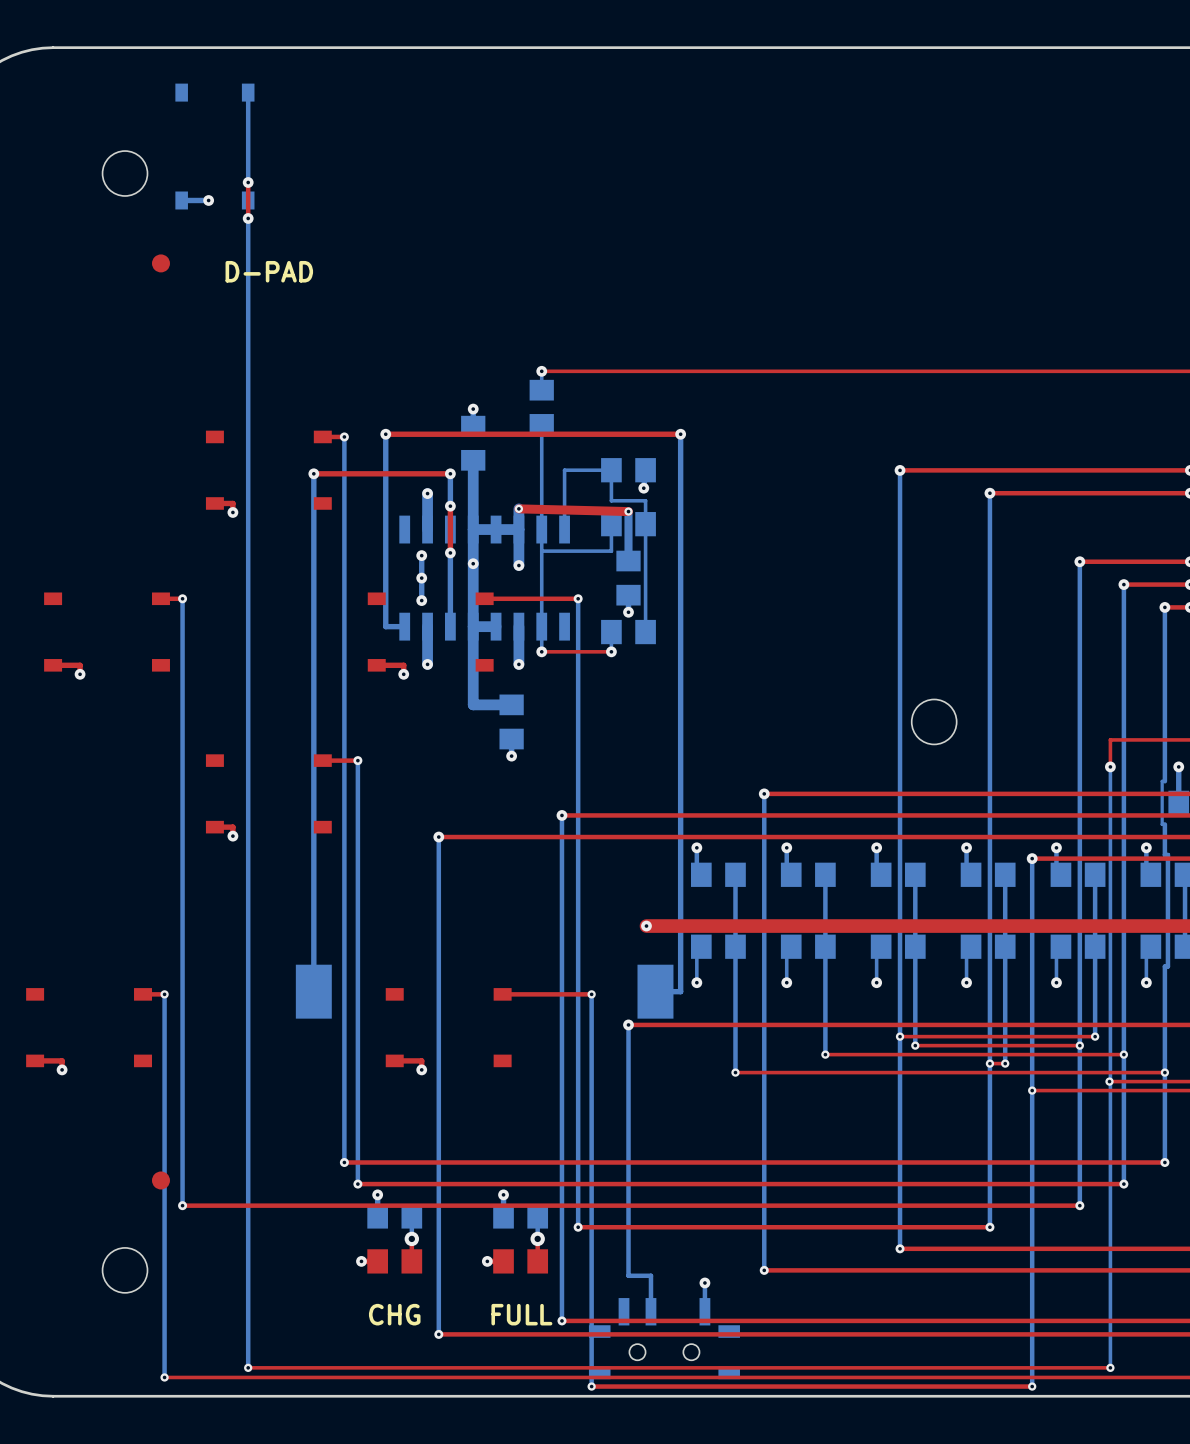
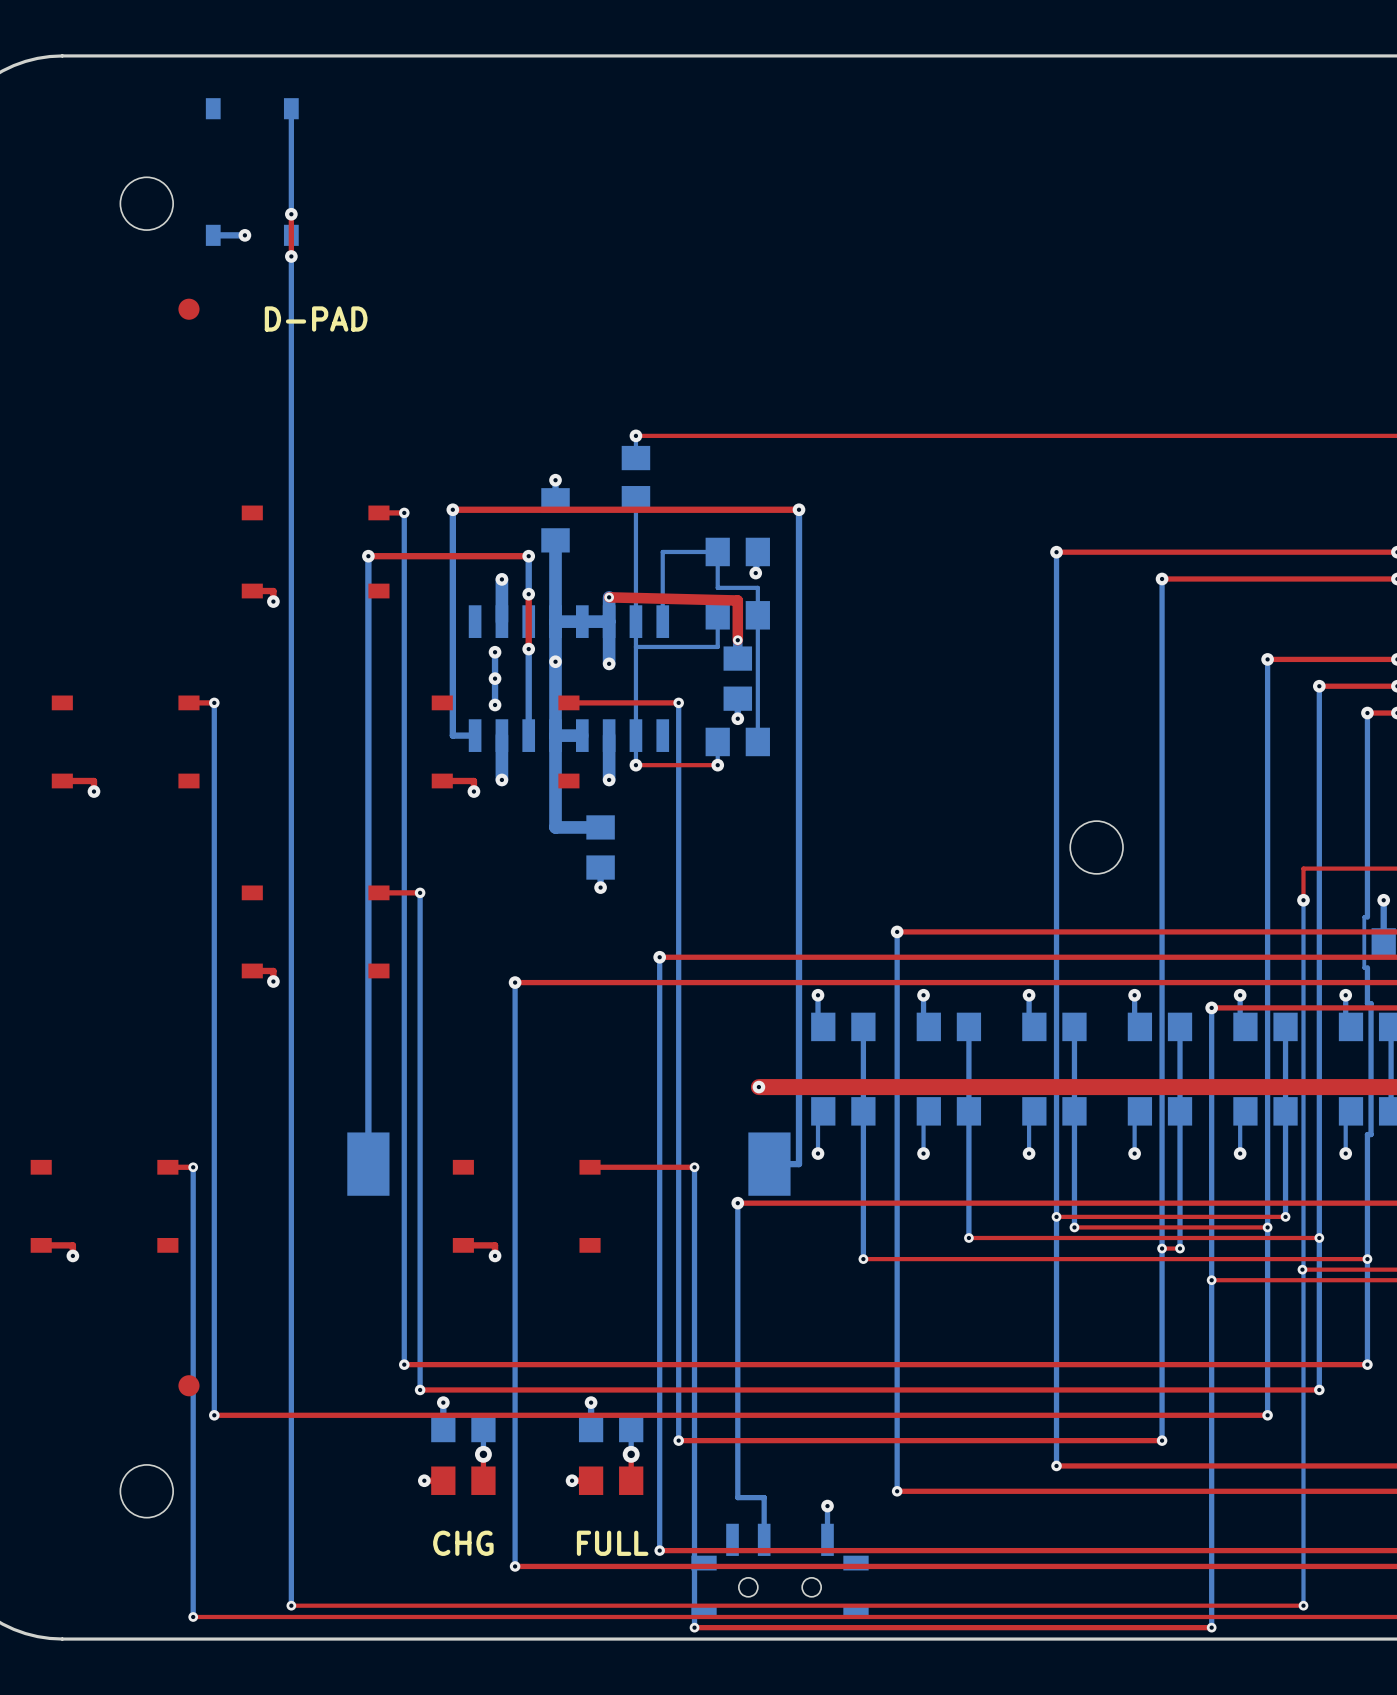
bottom track: (628, 511) (628, 545) -> none
top track: none -> (737, 600) (737, 640)
via position: (628, 511) -> (737, 640)

